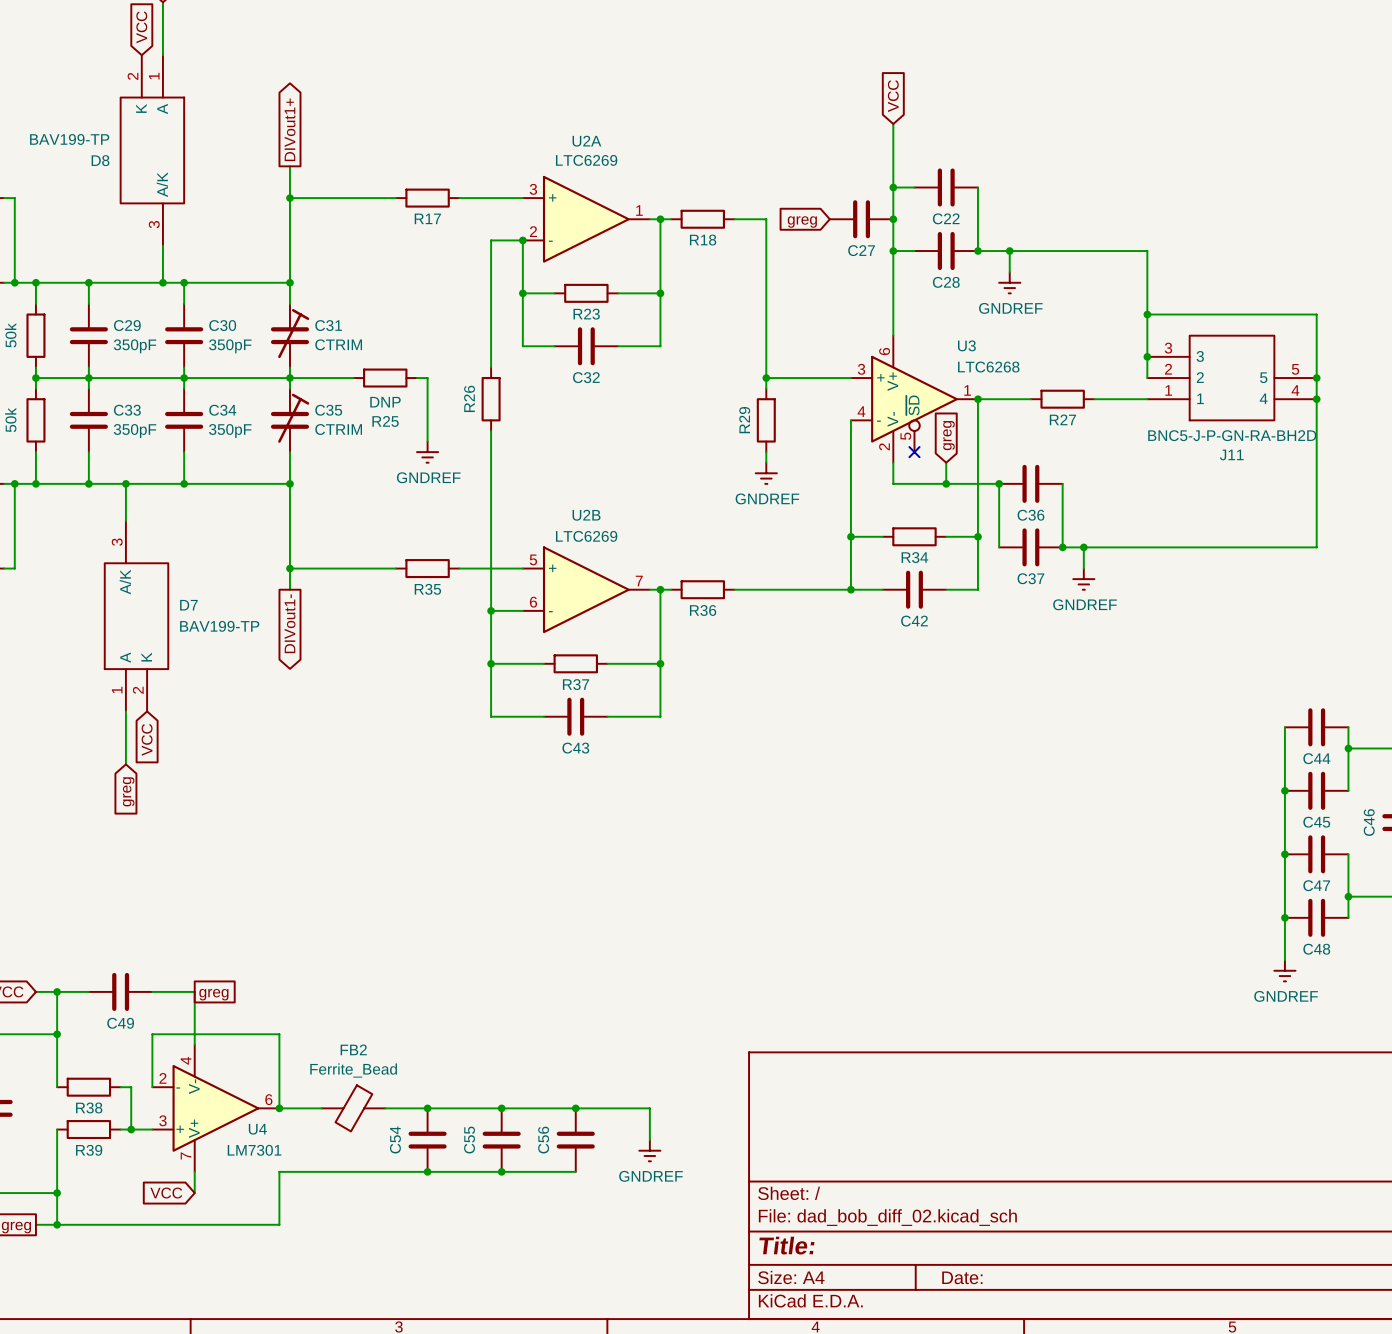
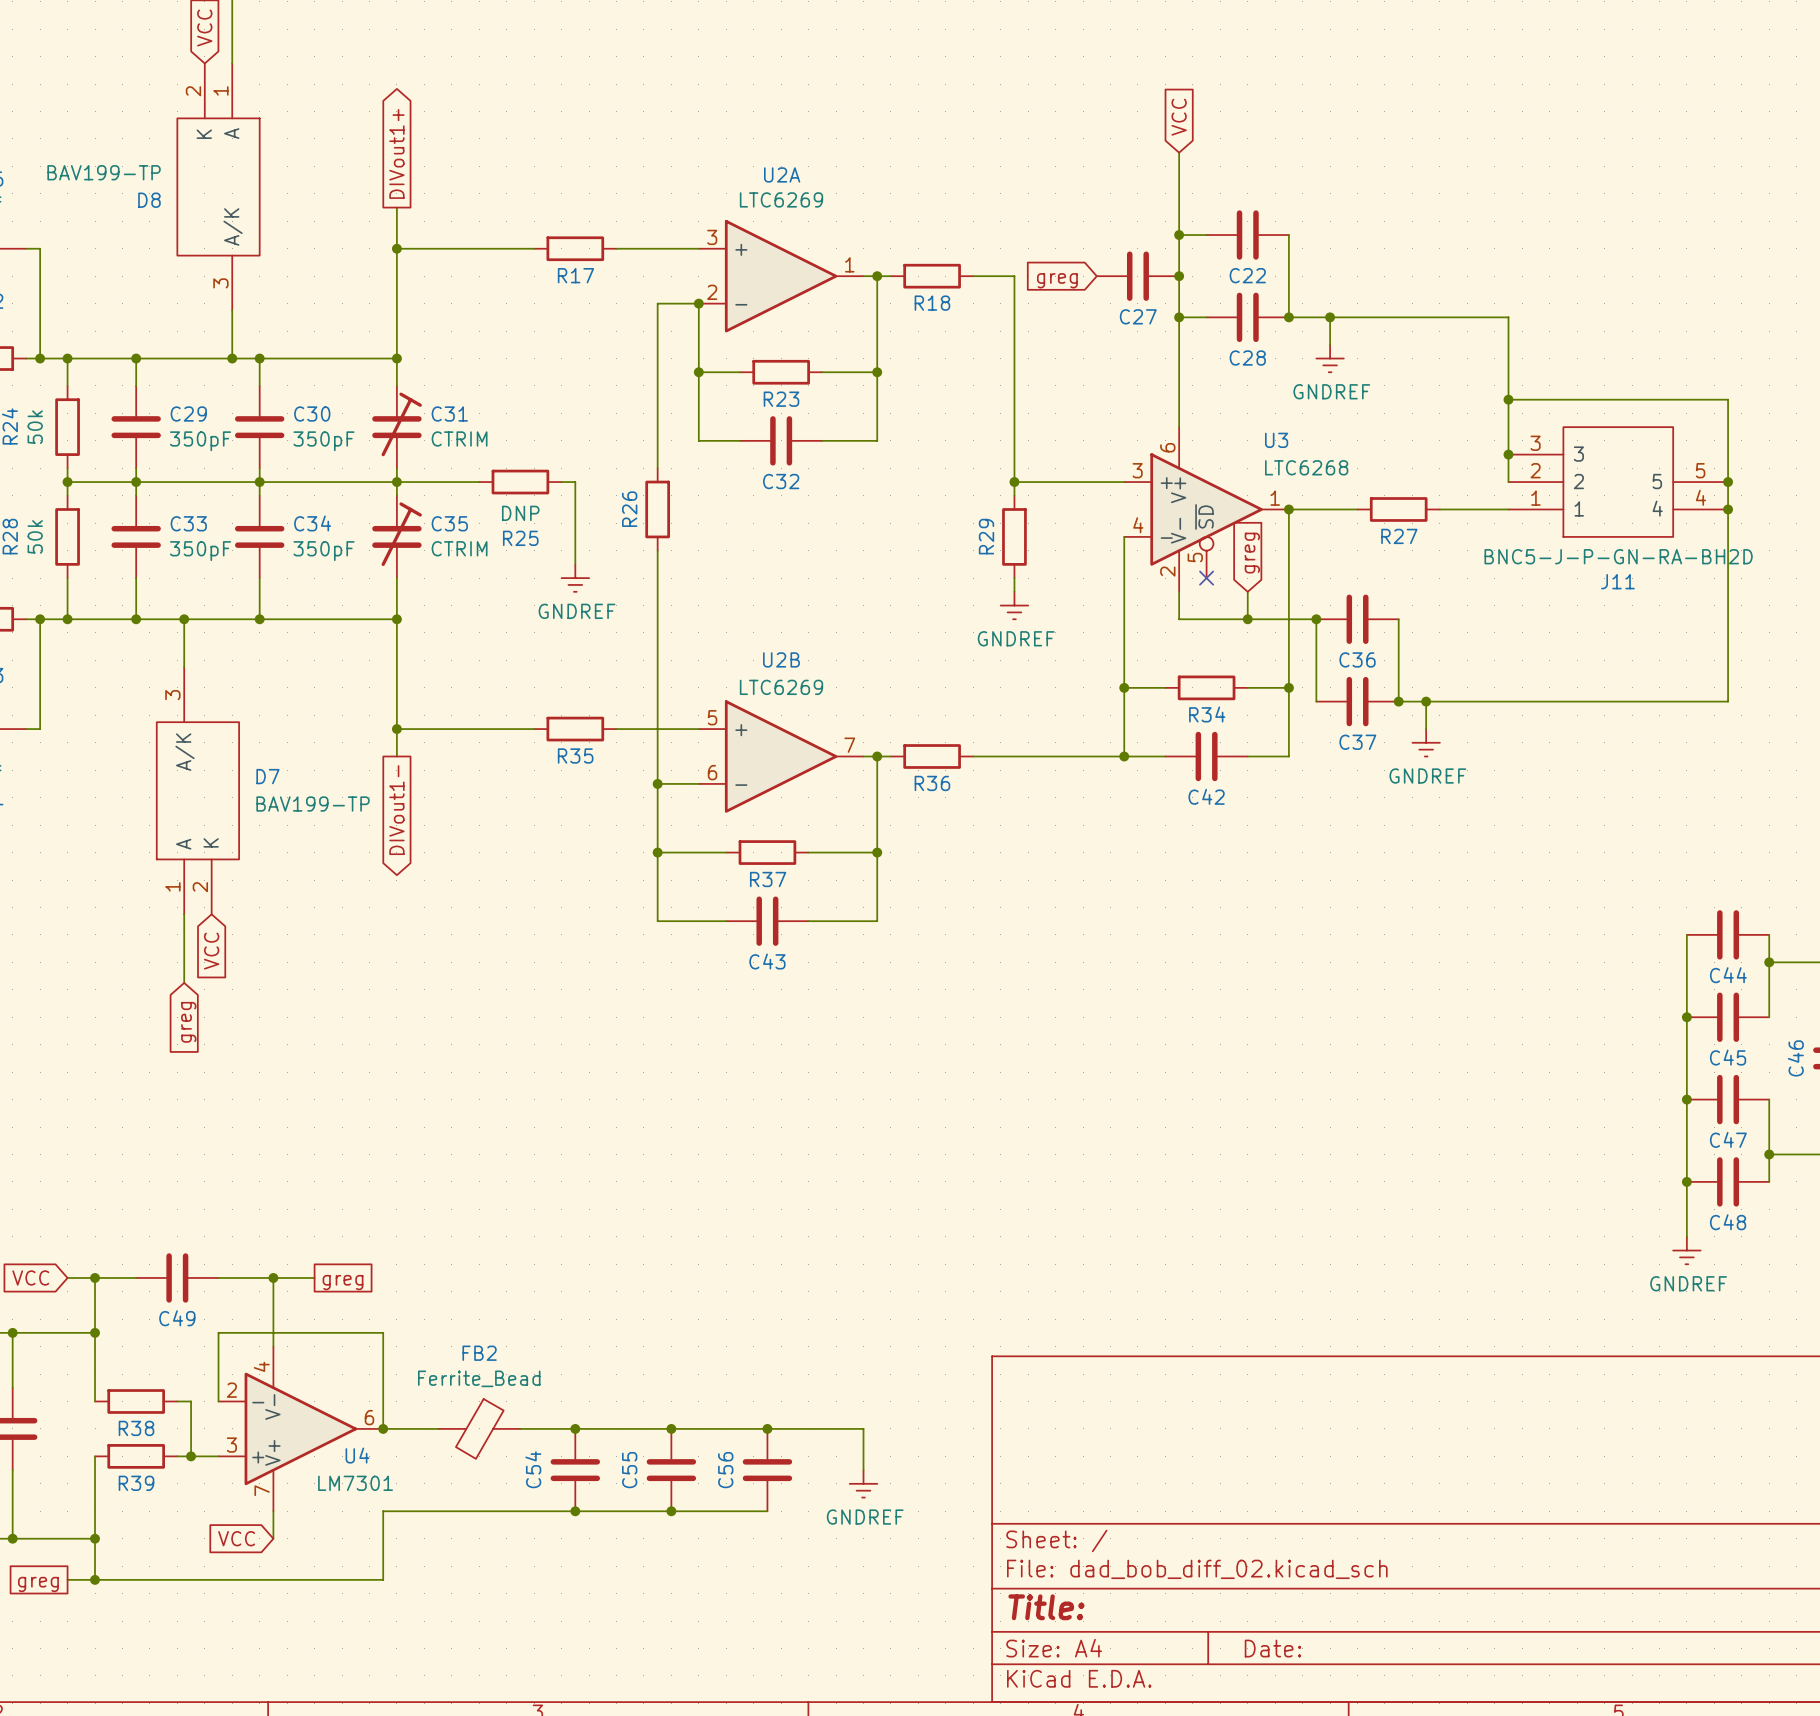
wire: none -> (273, 1277) (314, 1277)
junction: none -> (273, 1277)
global label position: greg (213, 994) -> greg (343, 1282)

